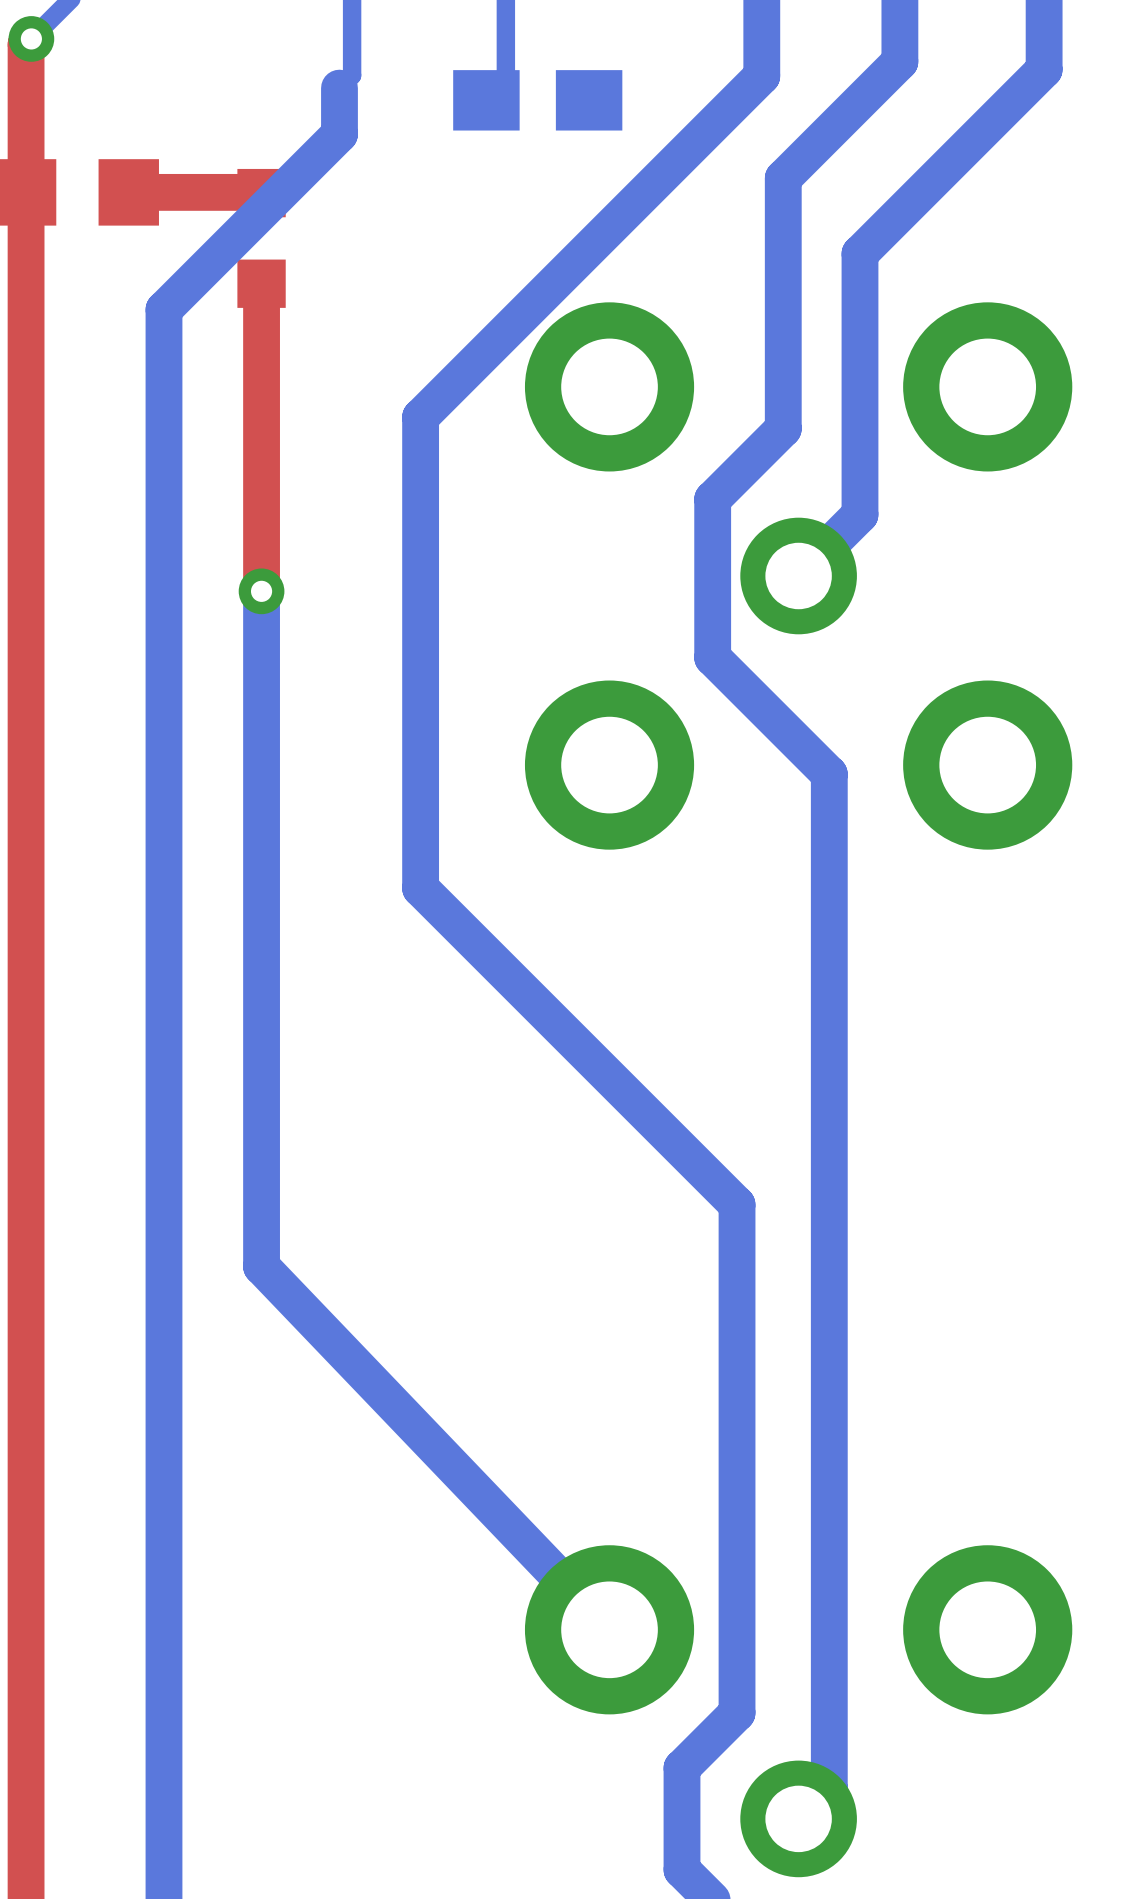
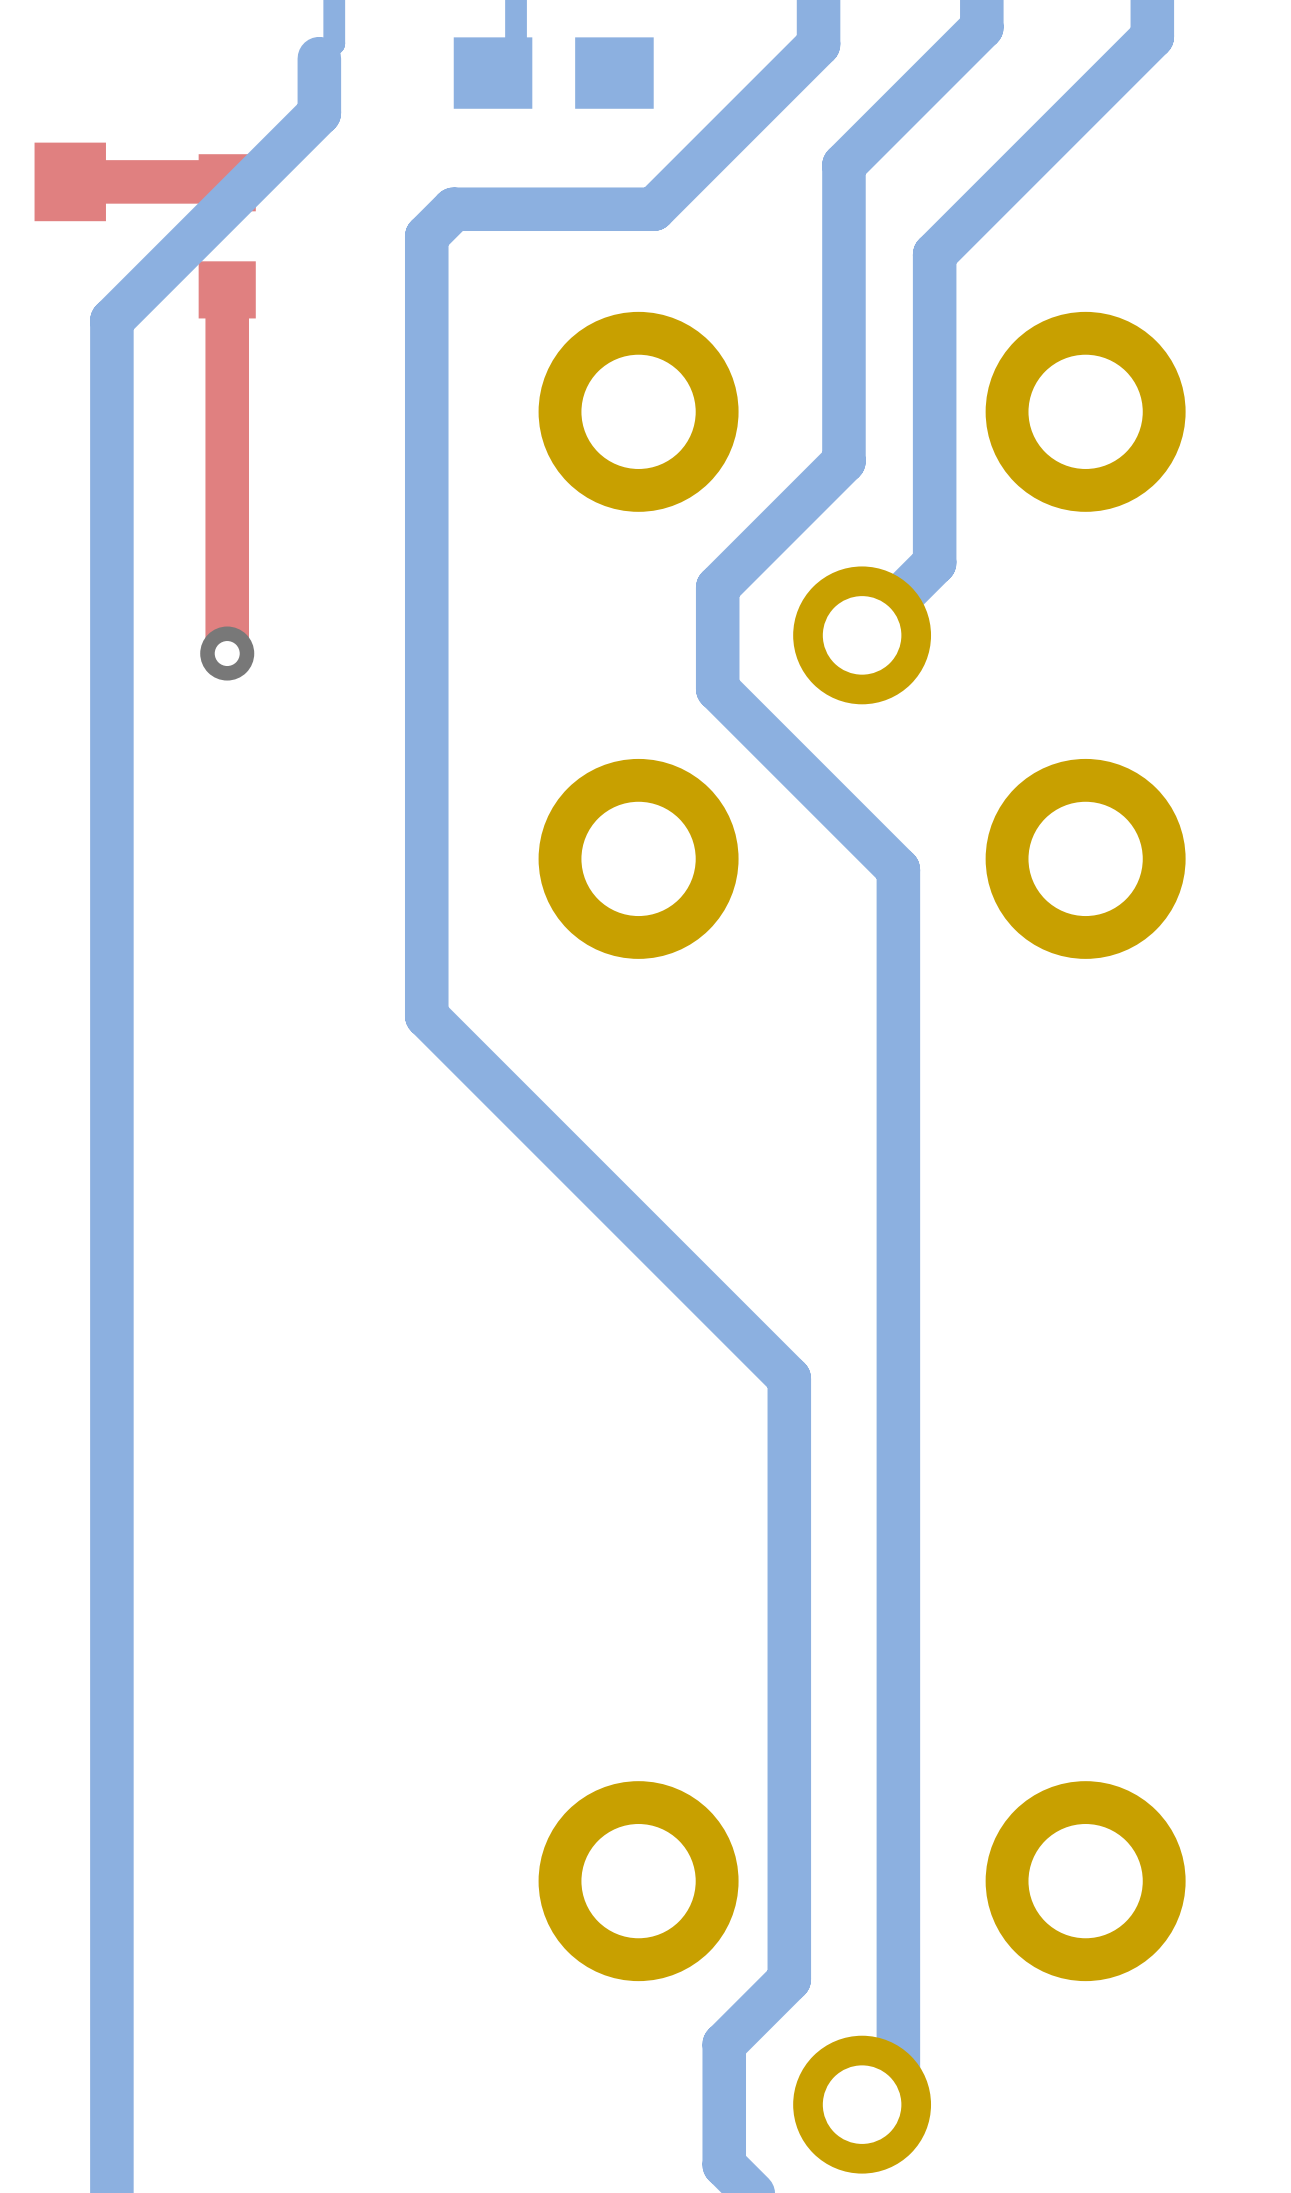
bottom track: (622, 215) (420, 417) (420, 888) (430, 898) -> (653, 209) (453, 209) (426, 236) (426, 1016)
bottom track: (712, 499) (712, 657) -> (760, 544) (717, 587) (717, 689) (760, 731)
bottom track: (261, 591) (261, 1266) (609, 1629) -> none

